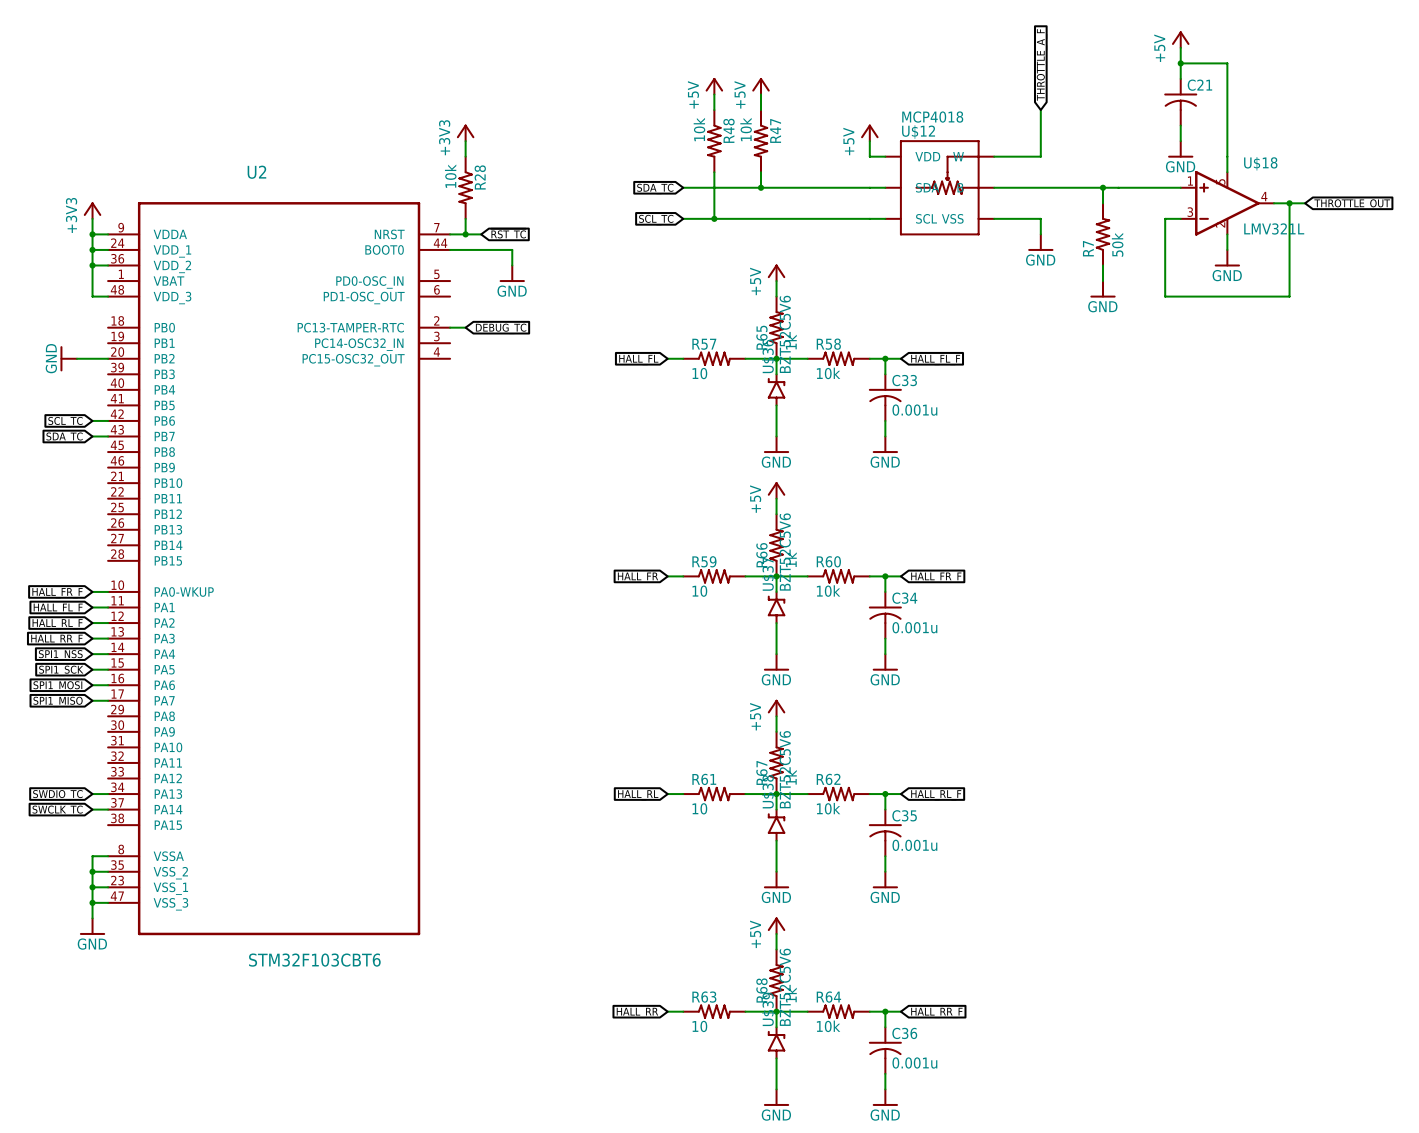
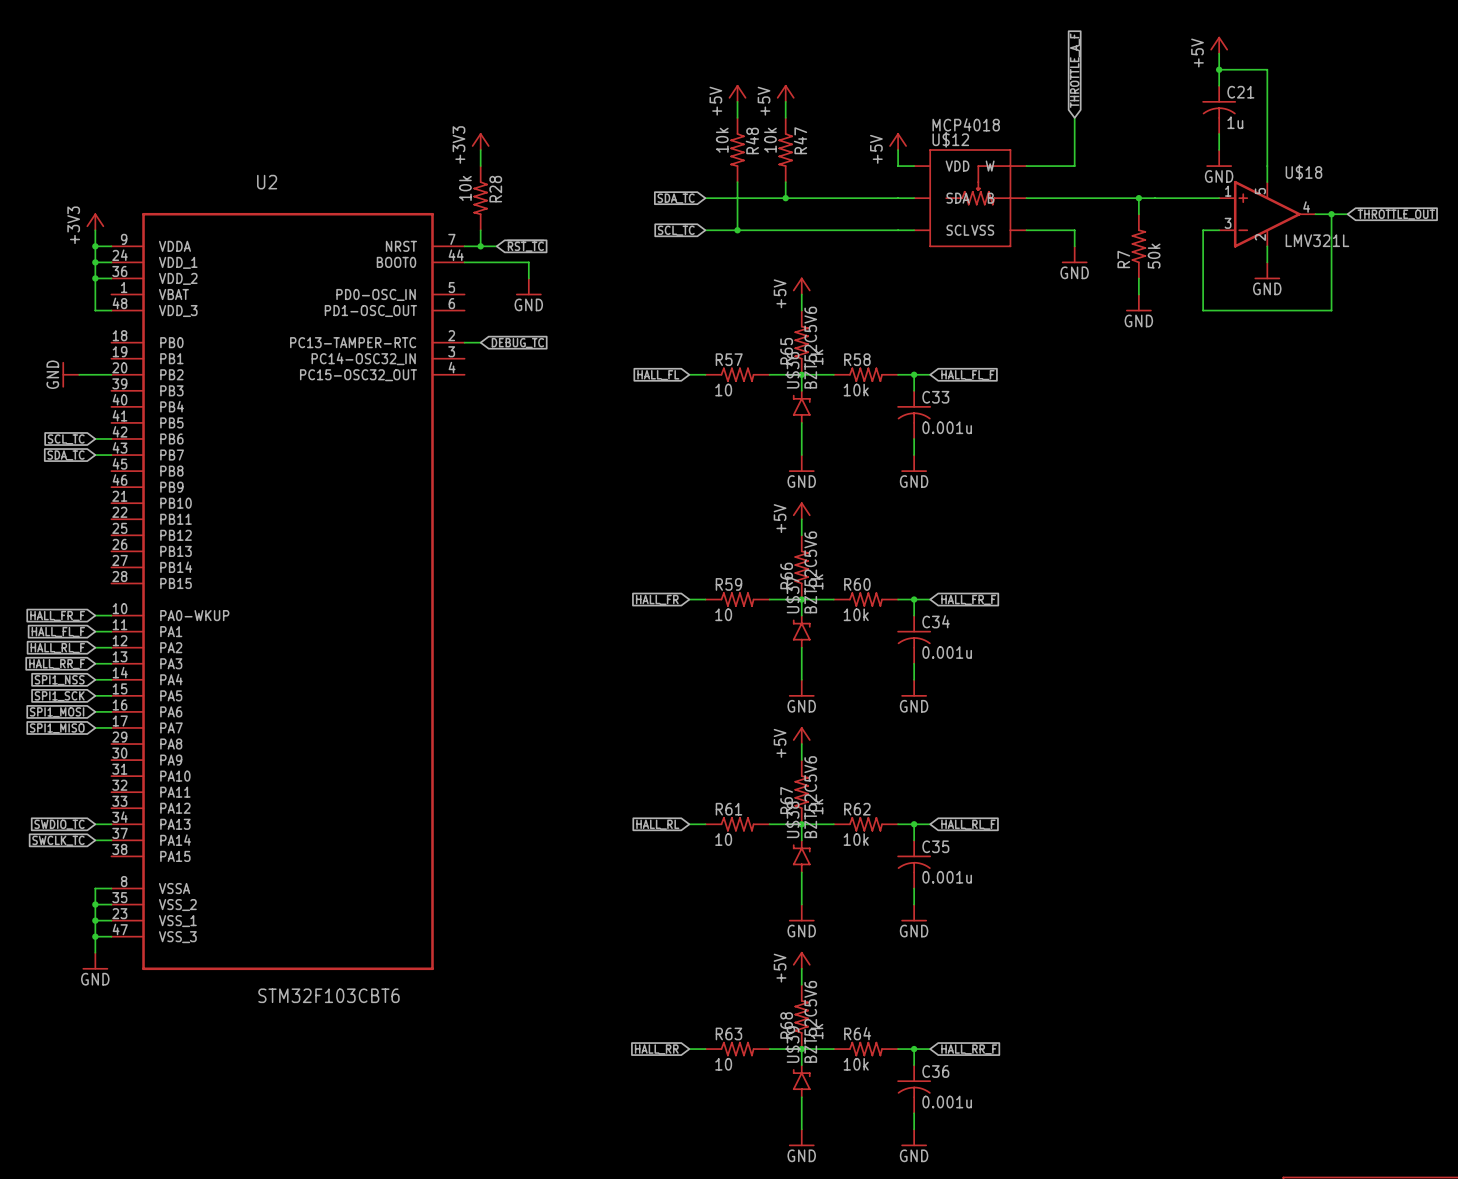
C21 value: none -> 1u (1235, 122)

